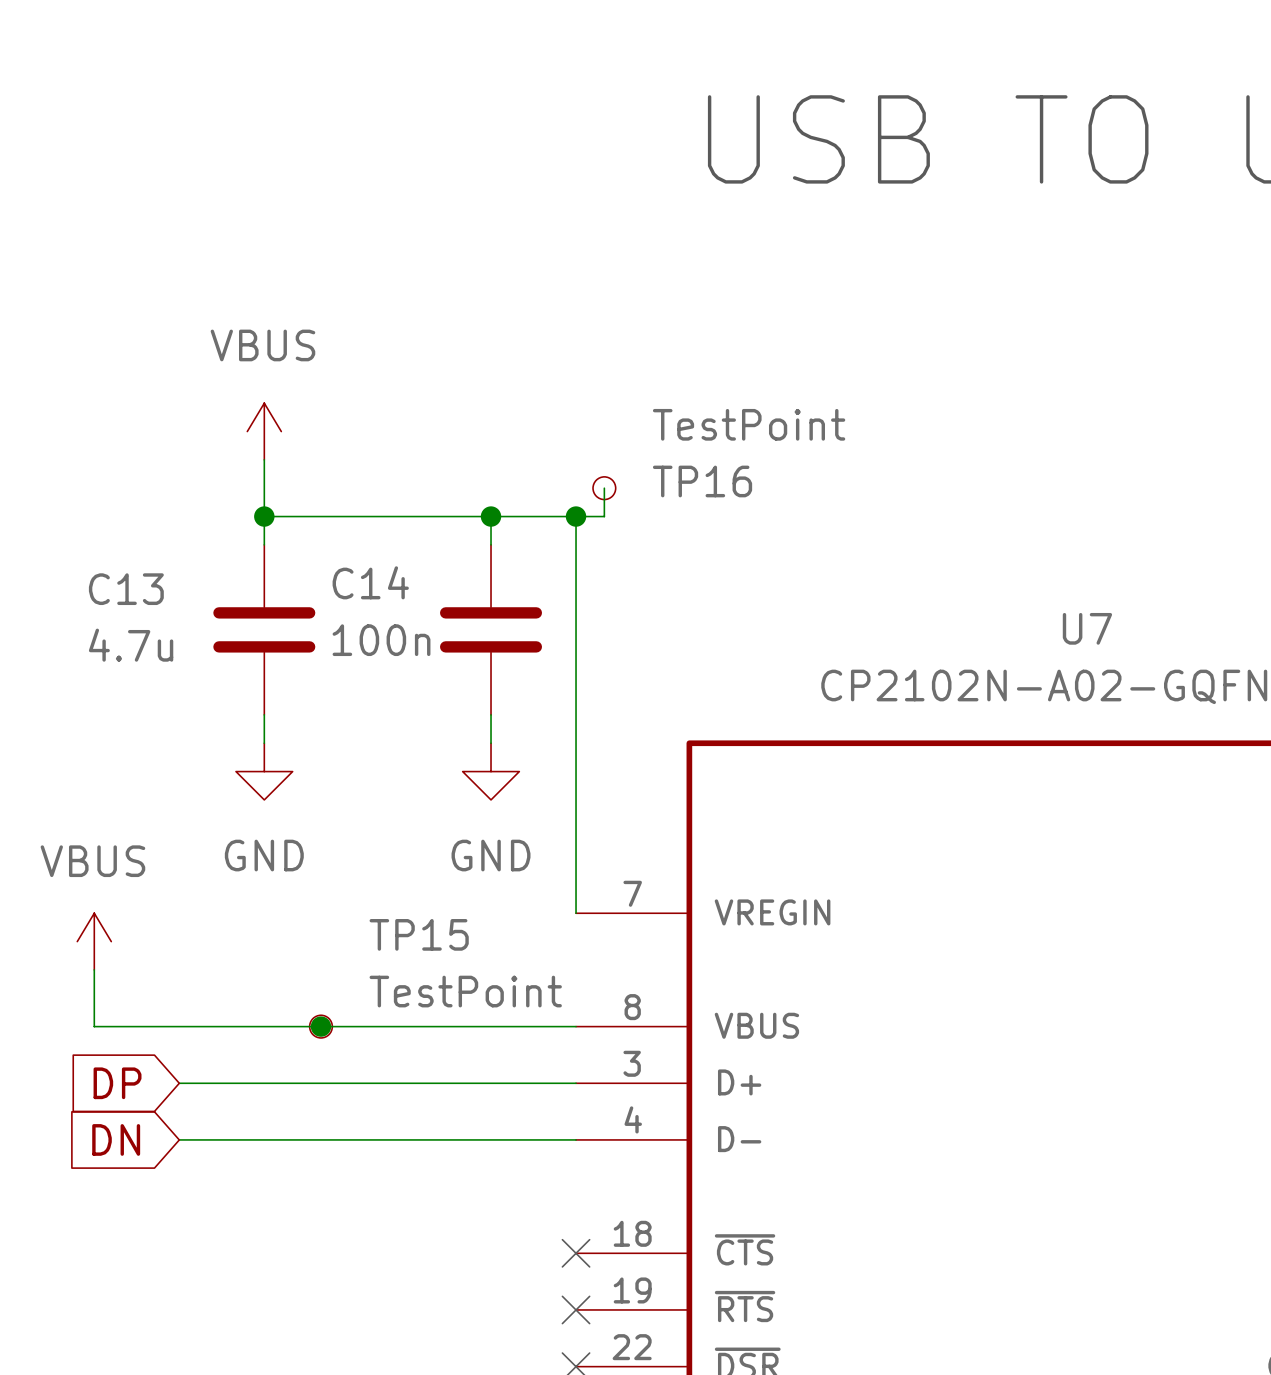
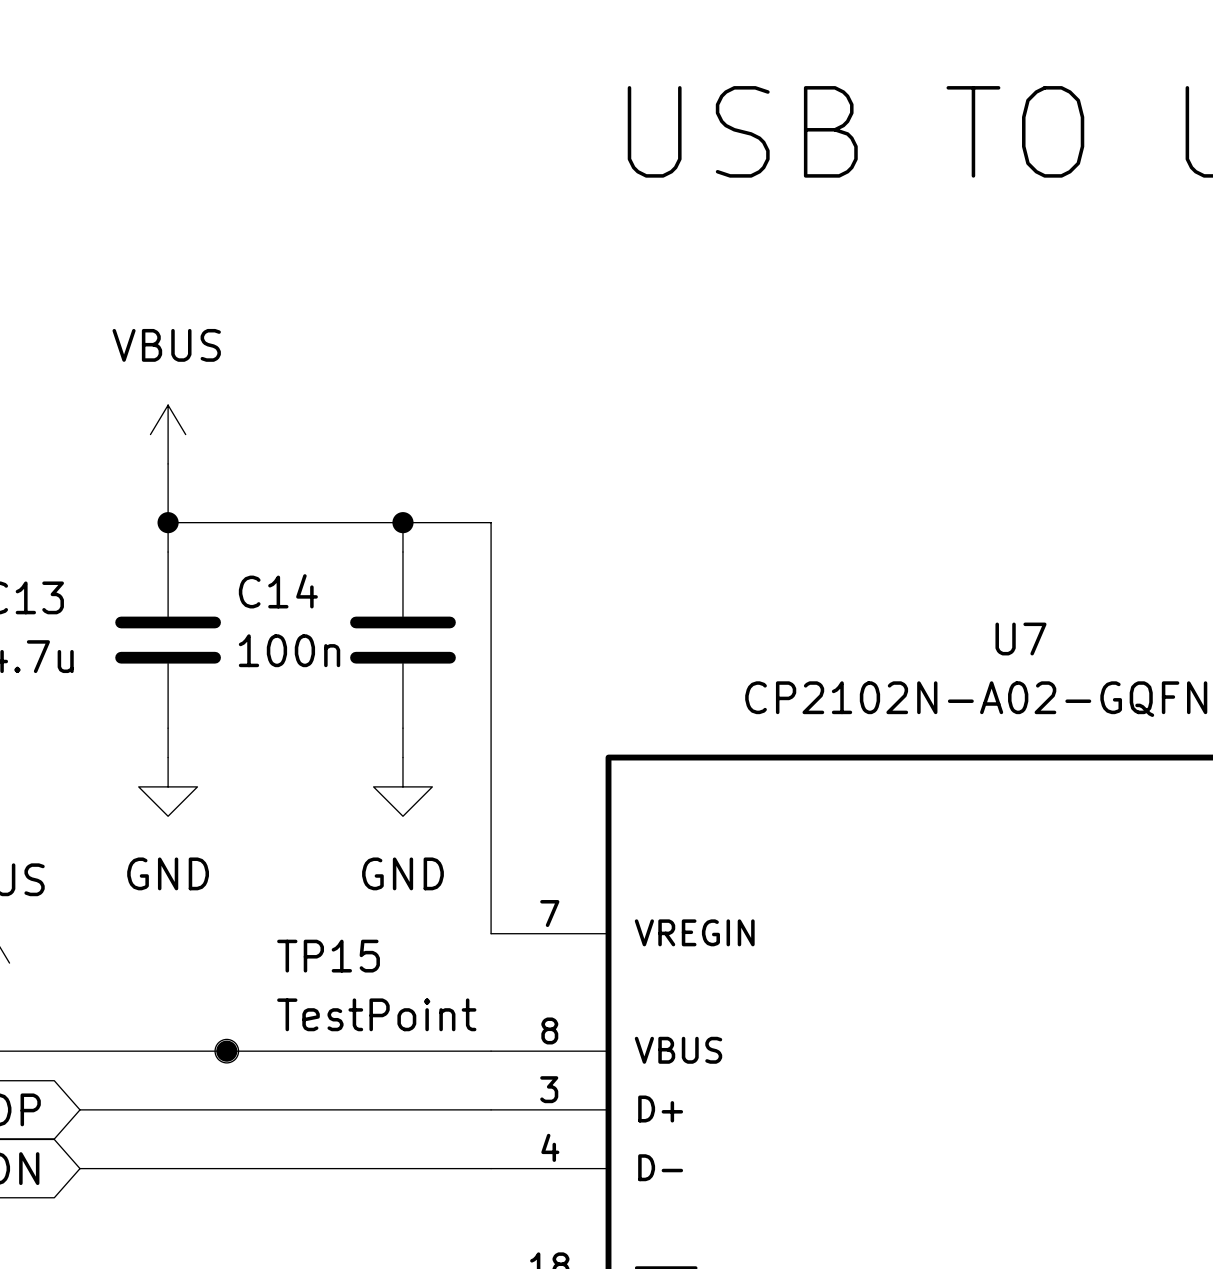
wire: (604, 488) (604, 516) (576, 516) -> none
TP16: TestPoint (604, 488) -> none
junction: (576, 516) -> none

